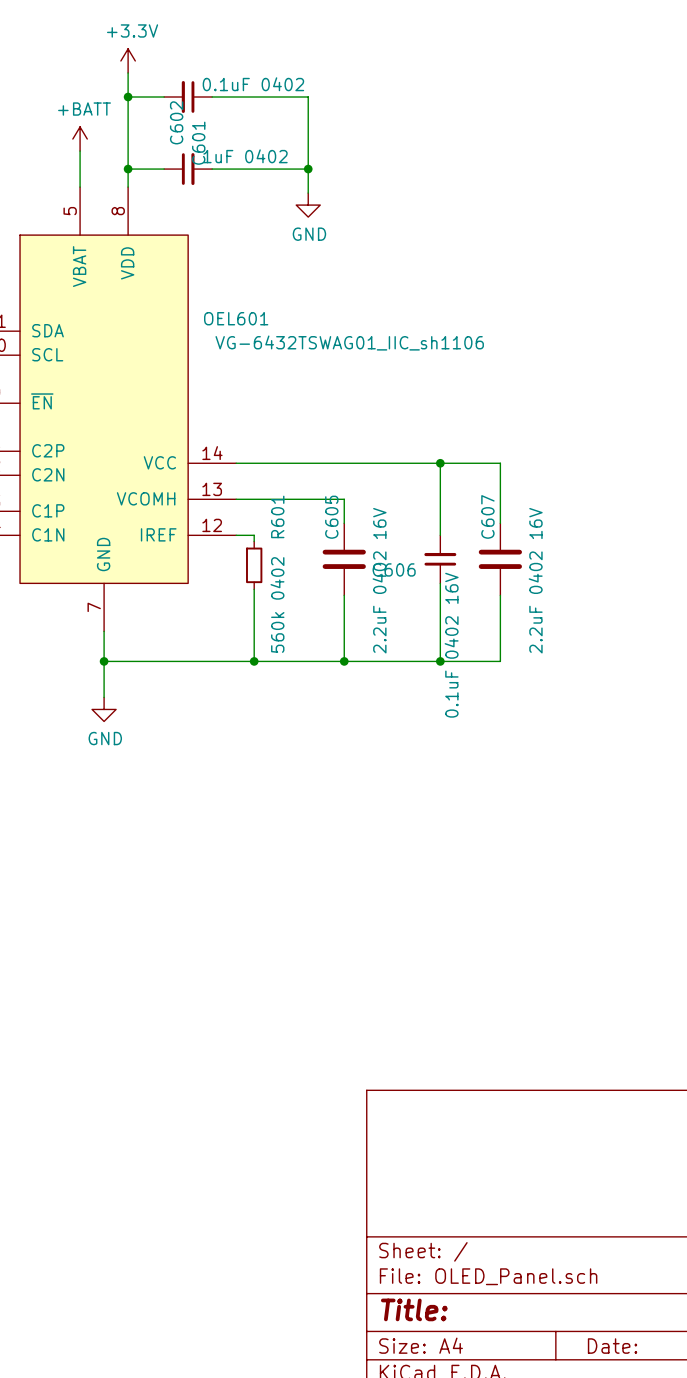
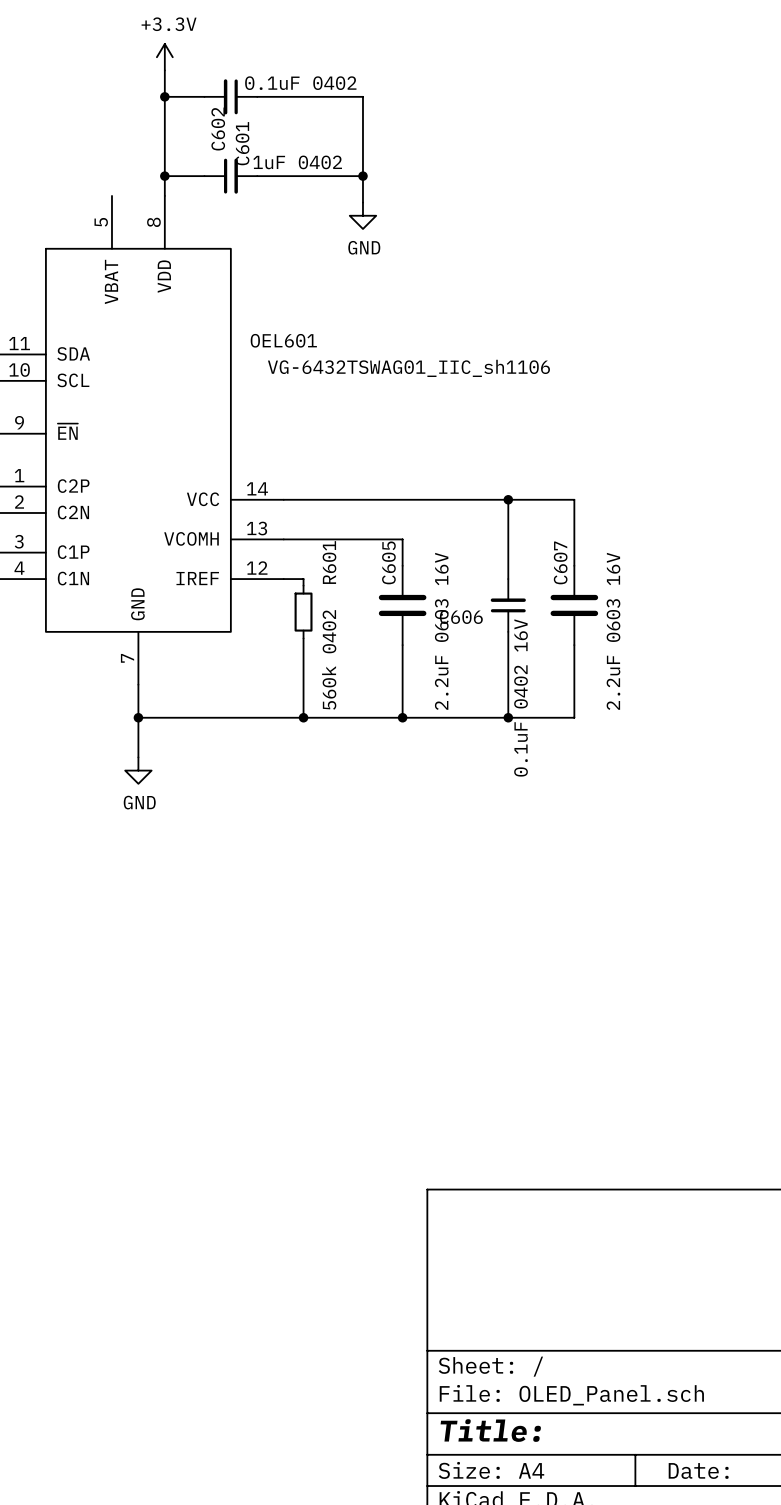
power symbol: +BATT (80, 139) -> none
wire: (80, 151) (80, 187) -> none
C605 value: 2.2uF 0402 16V (379, 580) -> 2.2uF 0603 16V (441, 631)
C607 value: 2.2uF 0402 16V (535, 580) -> 2.2uF 0603 16V (613, 631)

